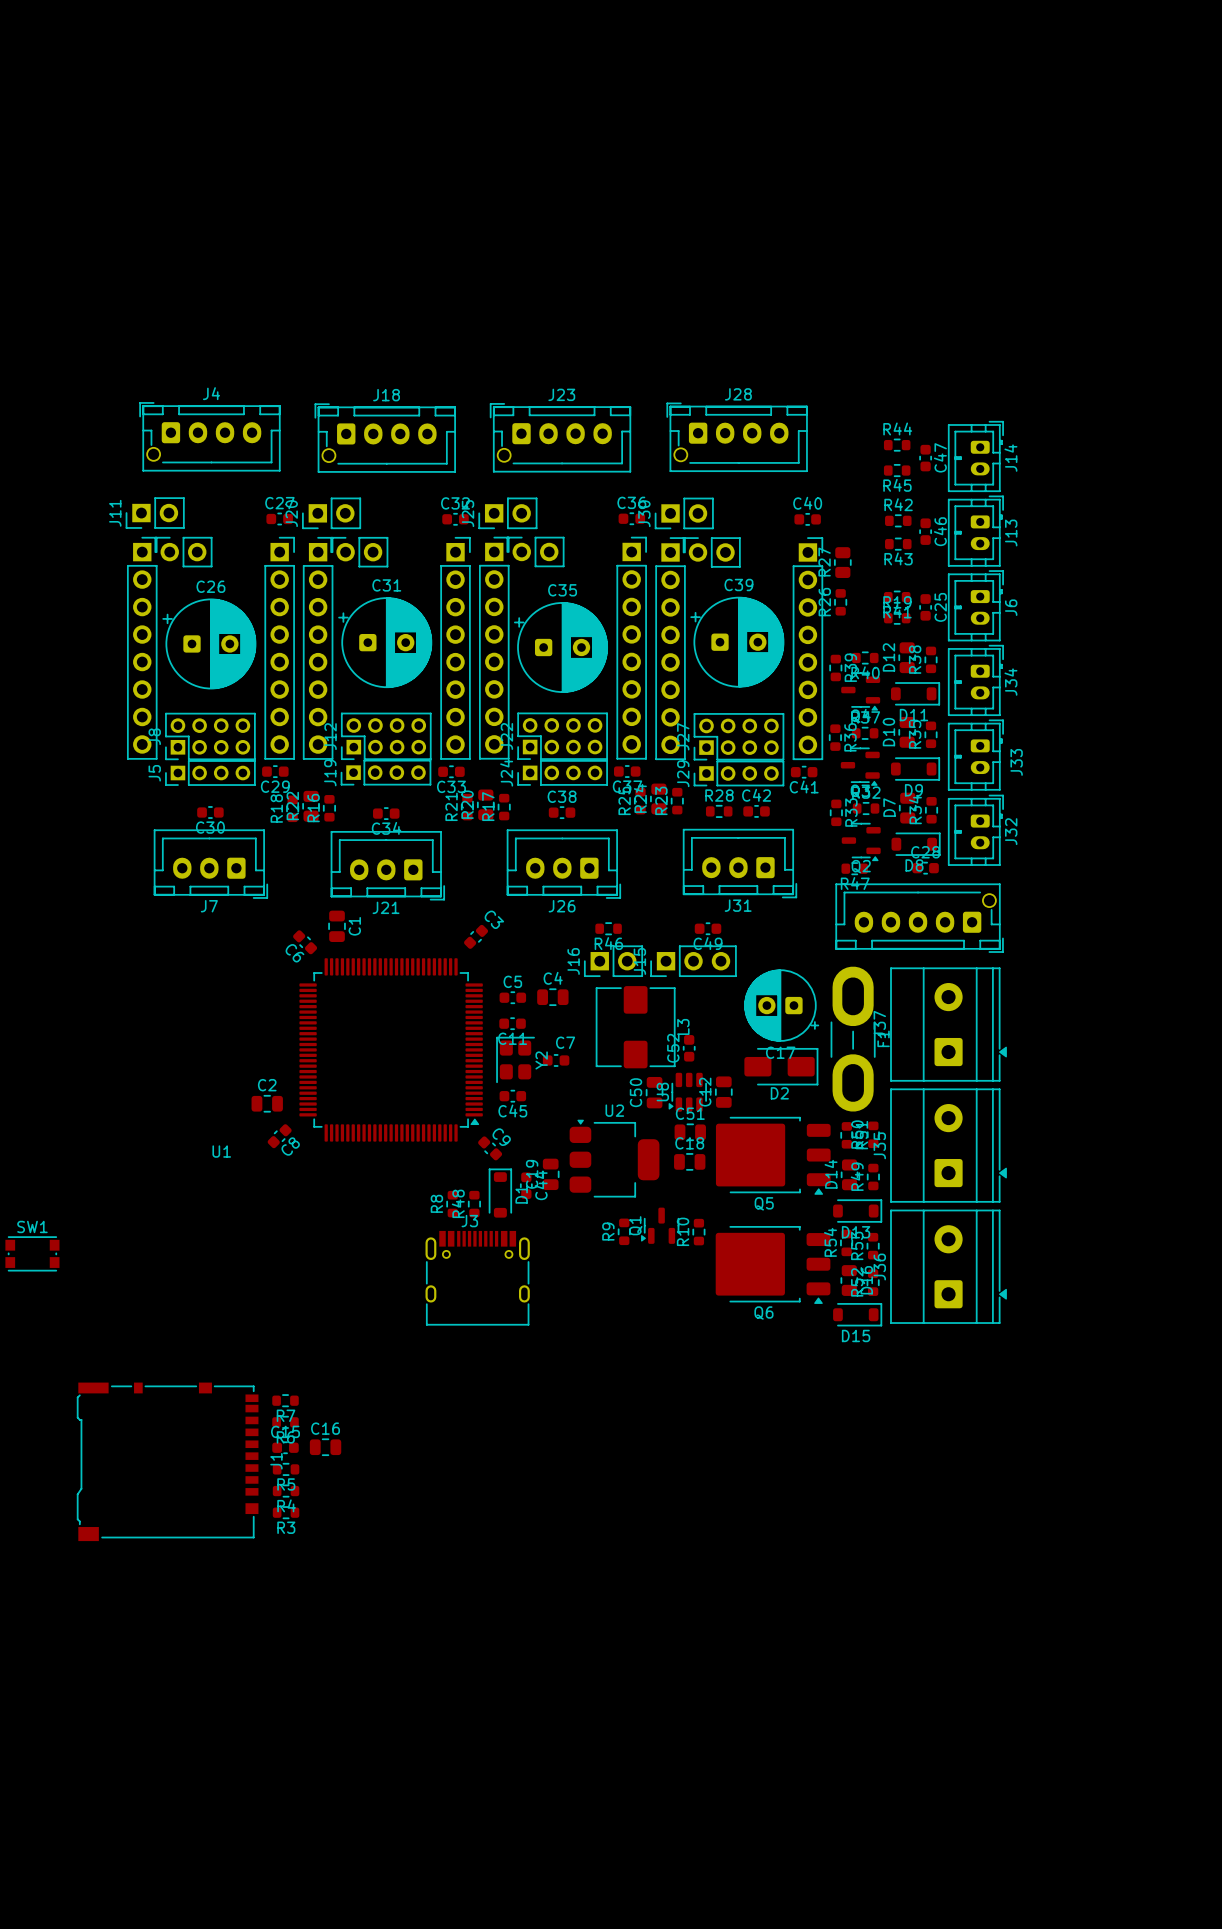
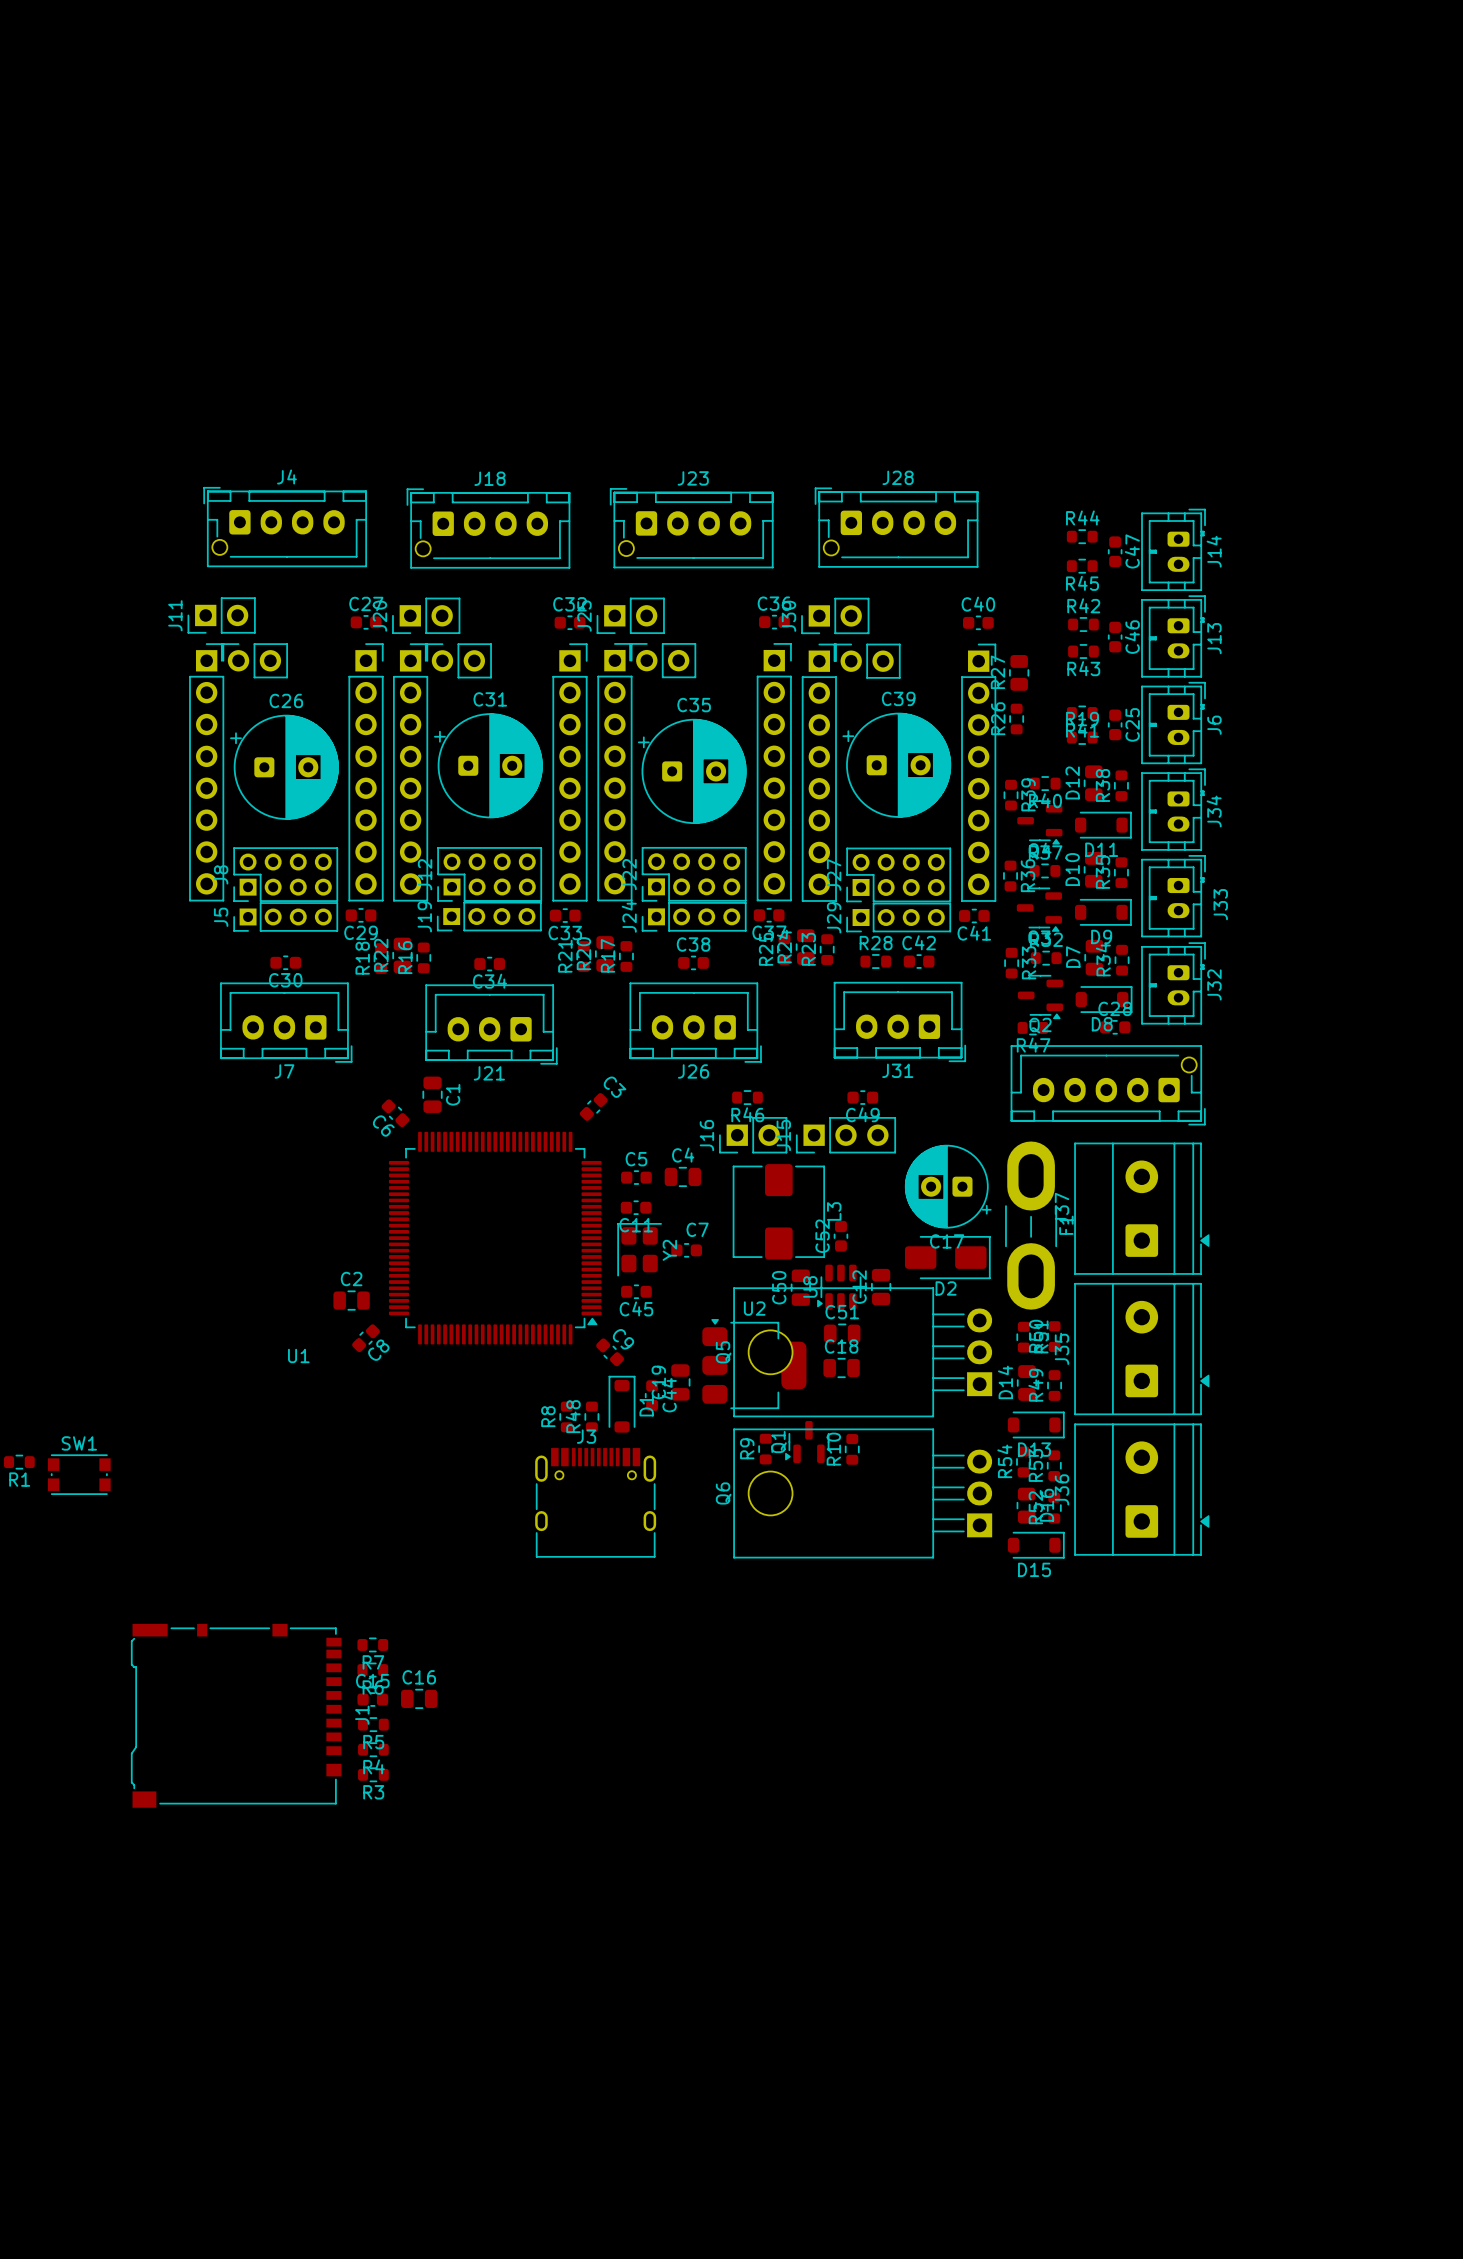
Q5 footprint: [715, 1117, 831, 1195] -> [733, 1287, 993, 1418]
Q5 name position: Q5 (764, 1203) -> Q5 (723, 1352)
Q6 footprint: [715, 1226, 831, 1304] -> [733, 1428, 993, 1559]
Q6 name position: Q6 (763, 1313) -> Q6 (723, 1493)

